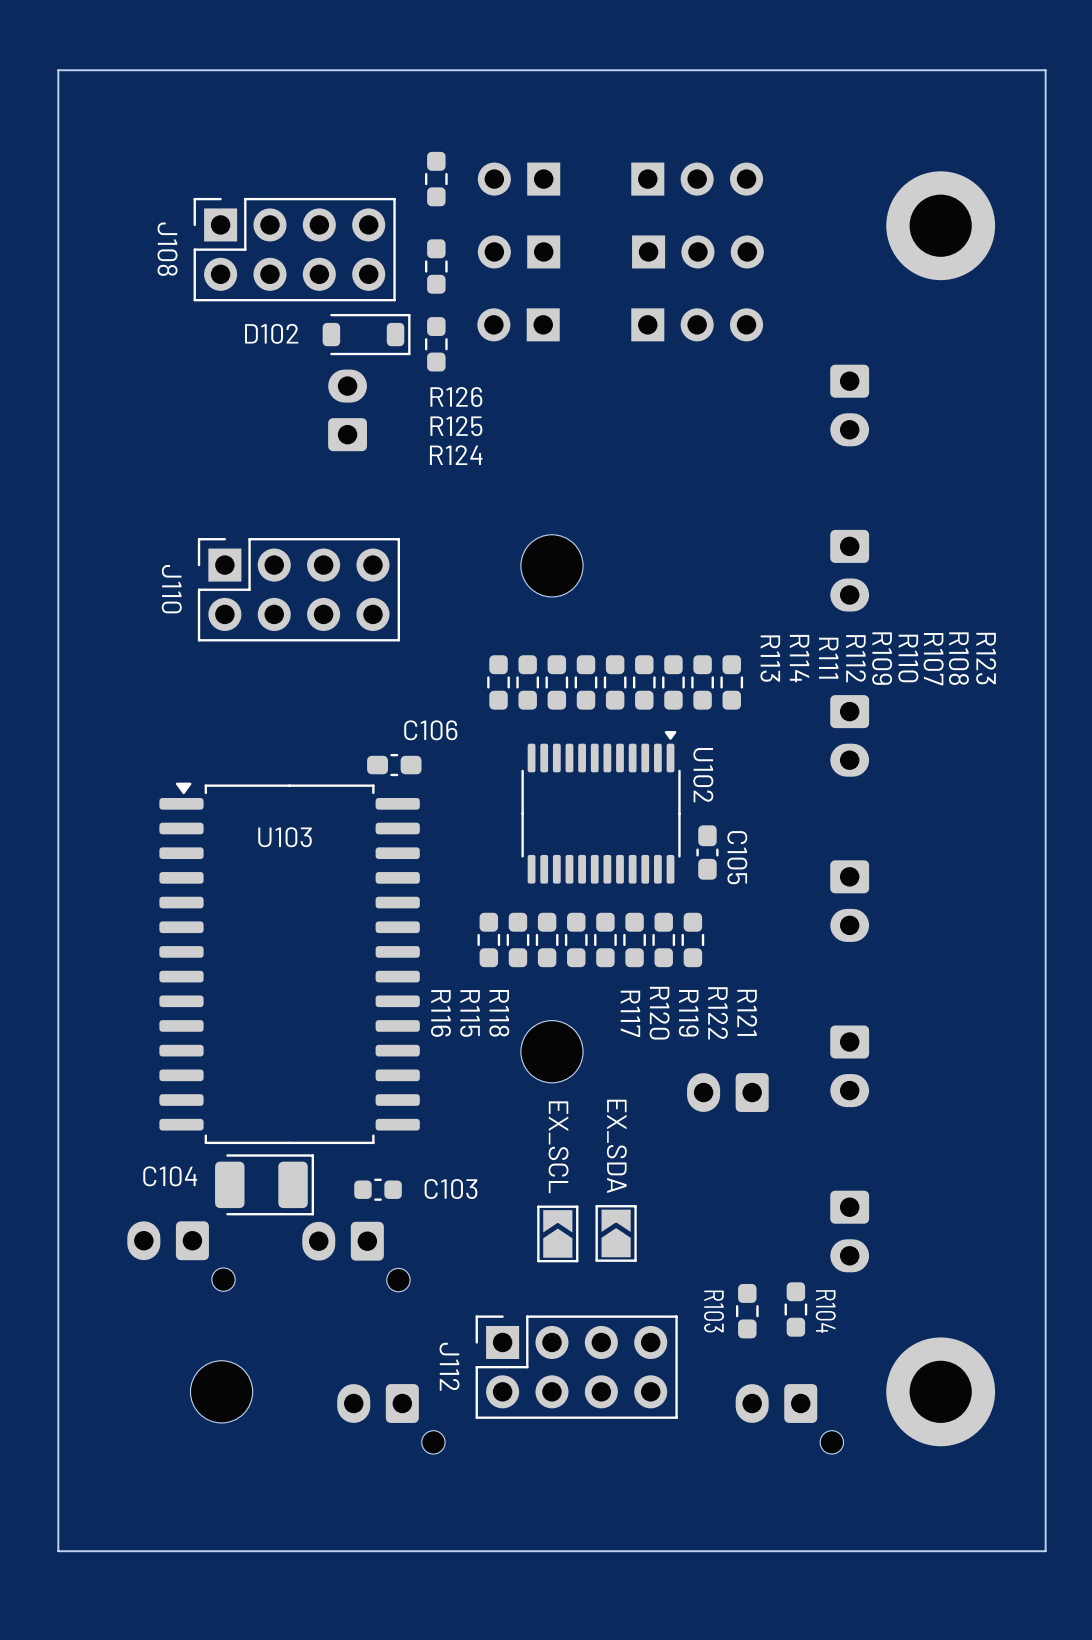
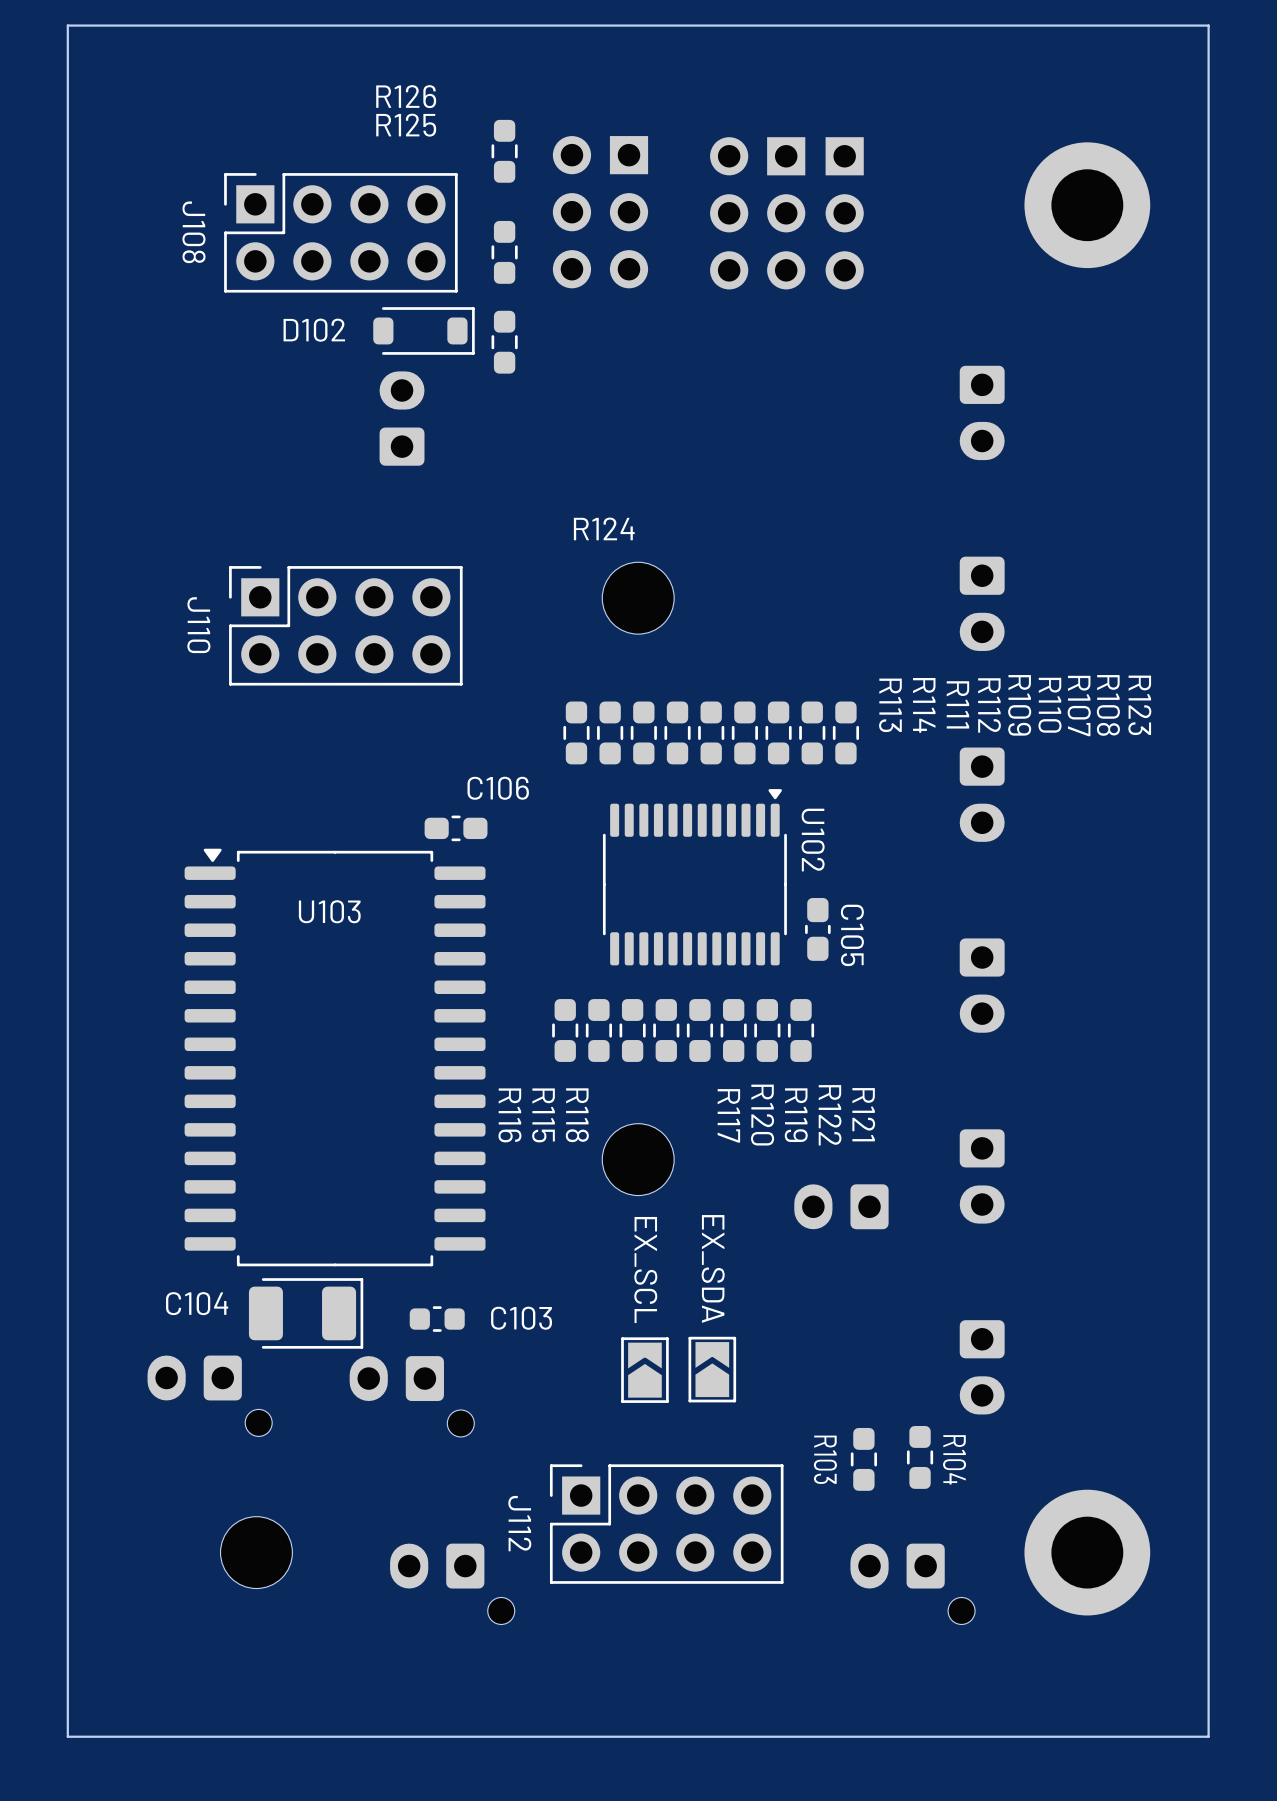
part: (519, 179) -> none
part: (697, 179) -> none
part: none -> (600, 212)
part: none -> (757, 213)
part: none -> (844, 213)
part: (519, 251) -> none
part: (697, 251) -> none
part: (518, 324) -> none
part: (697, 324) -> none
R126 name position: R126 (456, 396) -> R126 (406, 96)
R125 name position: R125 (456, 426) -> R125 (406, 125)
R124 name position: R124 (456, 455) -> R124 (604, 528)

